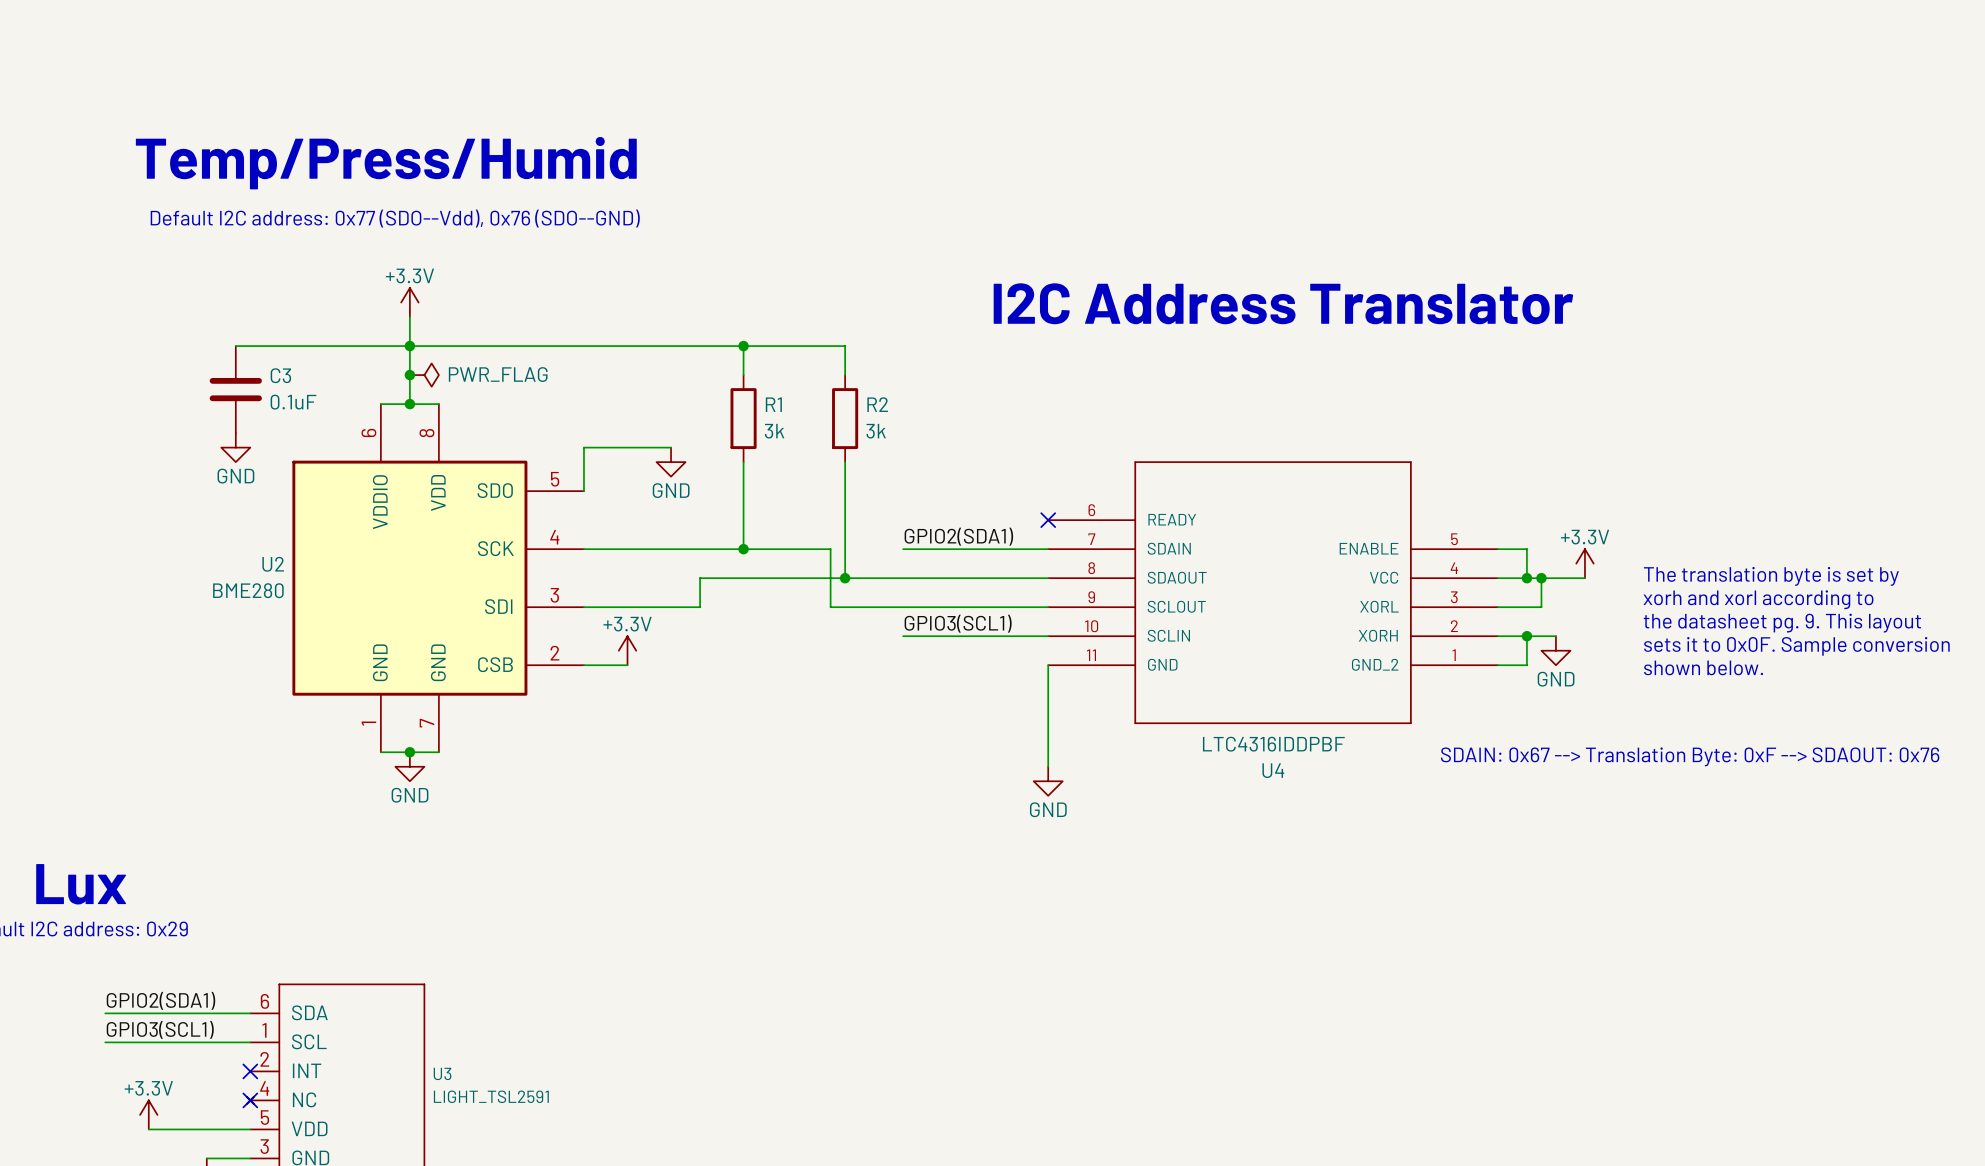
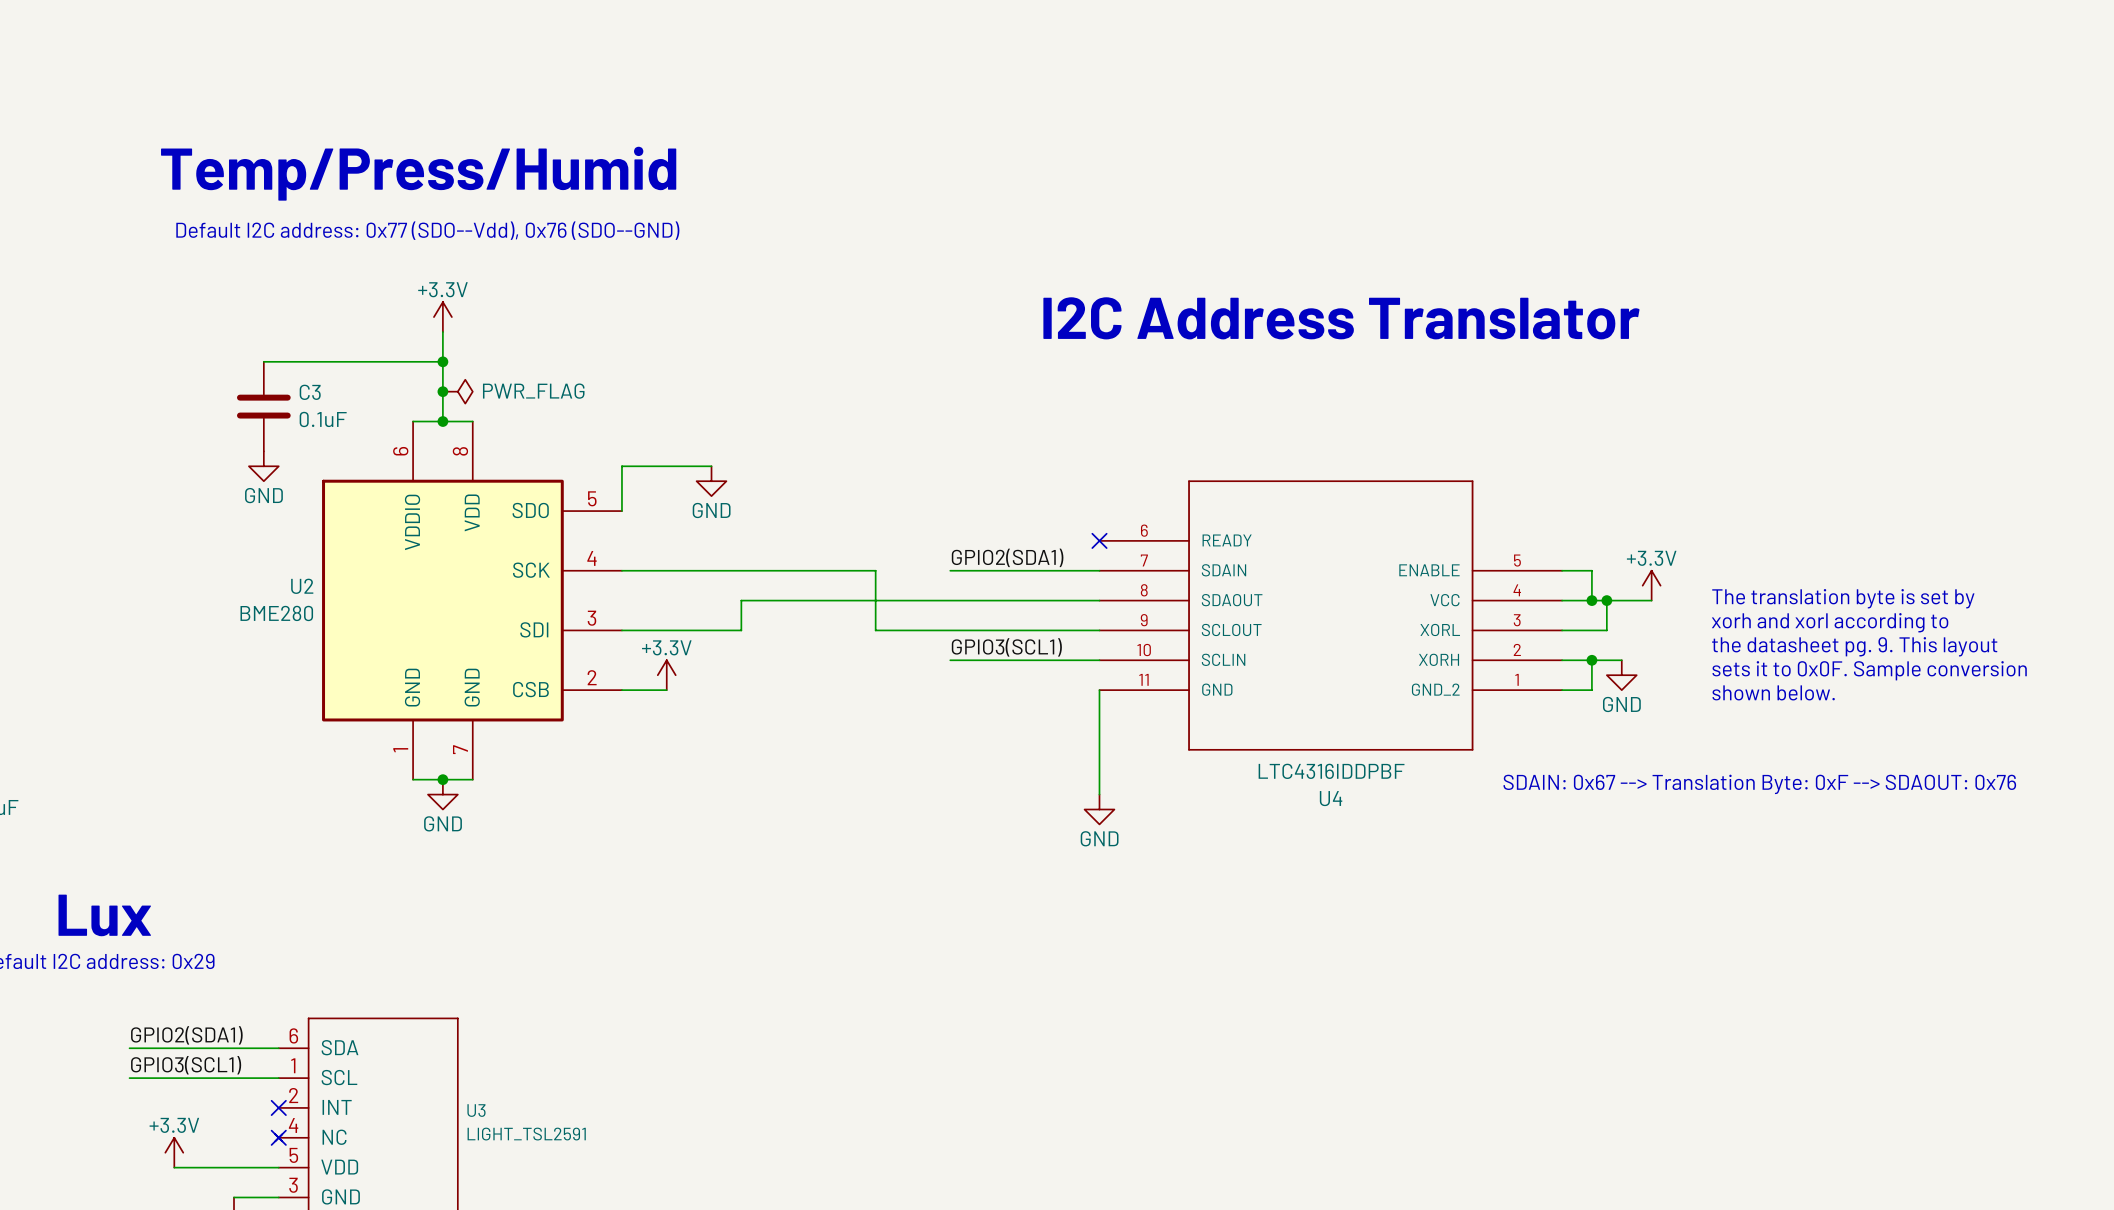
wire: (409, 346) (845, 346) (845, 375) -> none
wire: (743, 346) (743, 375) -> none
junction: (743, 346) -> none
R1: 3k (743, 418) -> none
R2: 3k (845, 418) -> none
wire: (743, 462) (743, 549) -> none
wire: (845, 462) (845, 578) -> none
junction: (743, 549) -> none
junction: (845, 578) -> none

